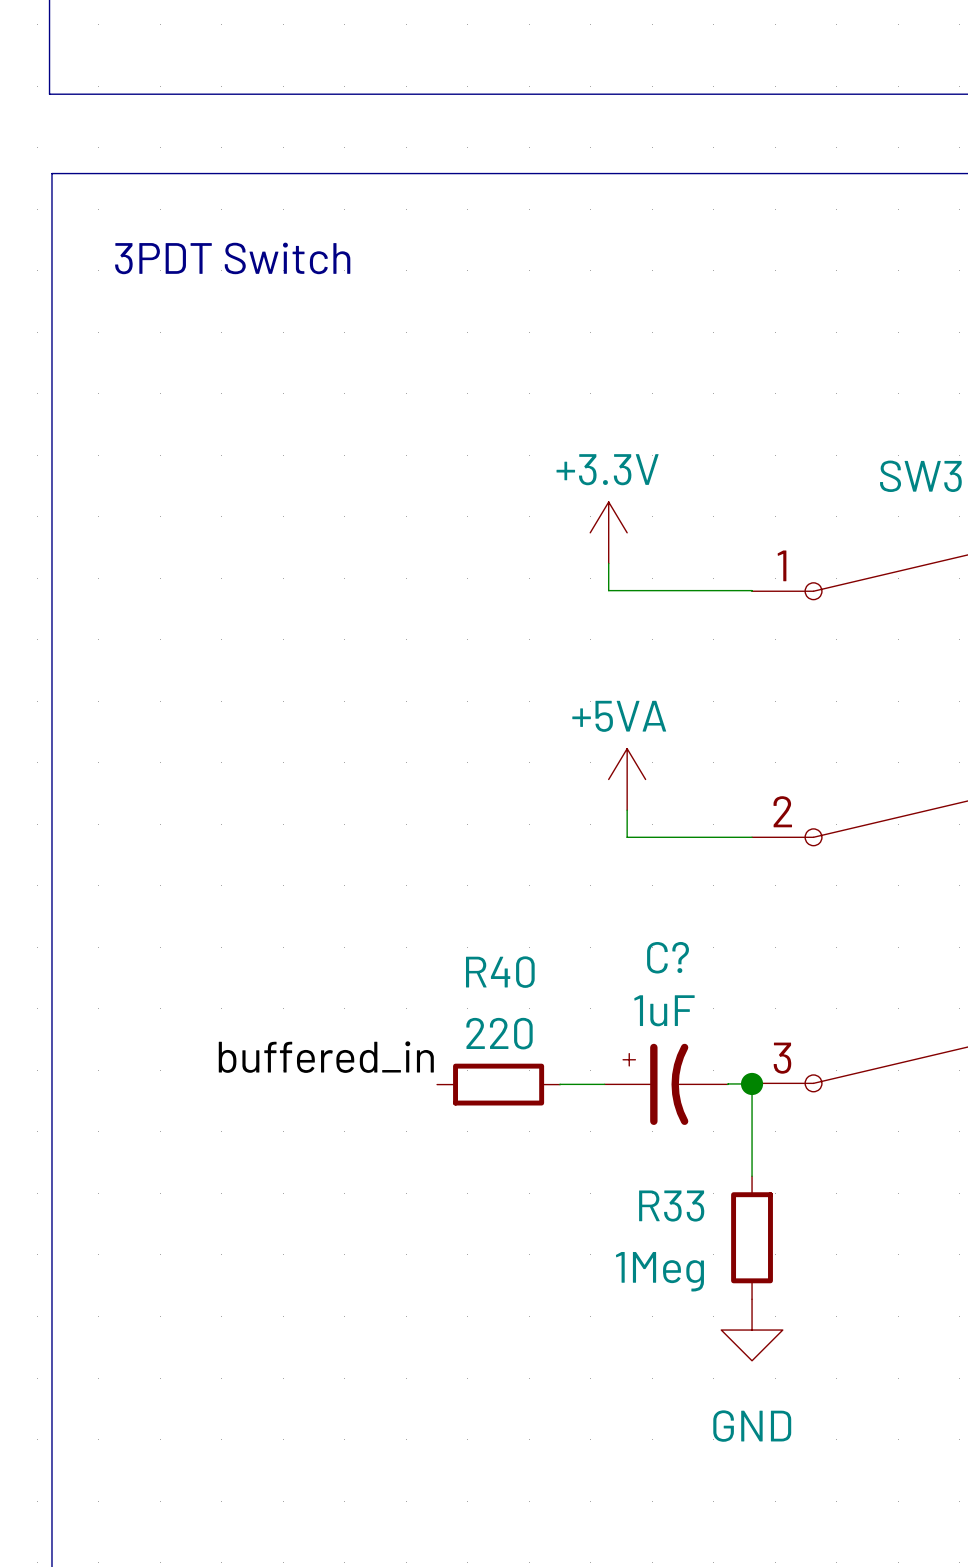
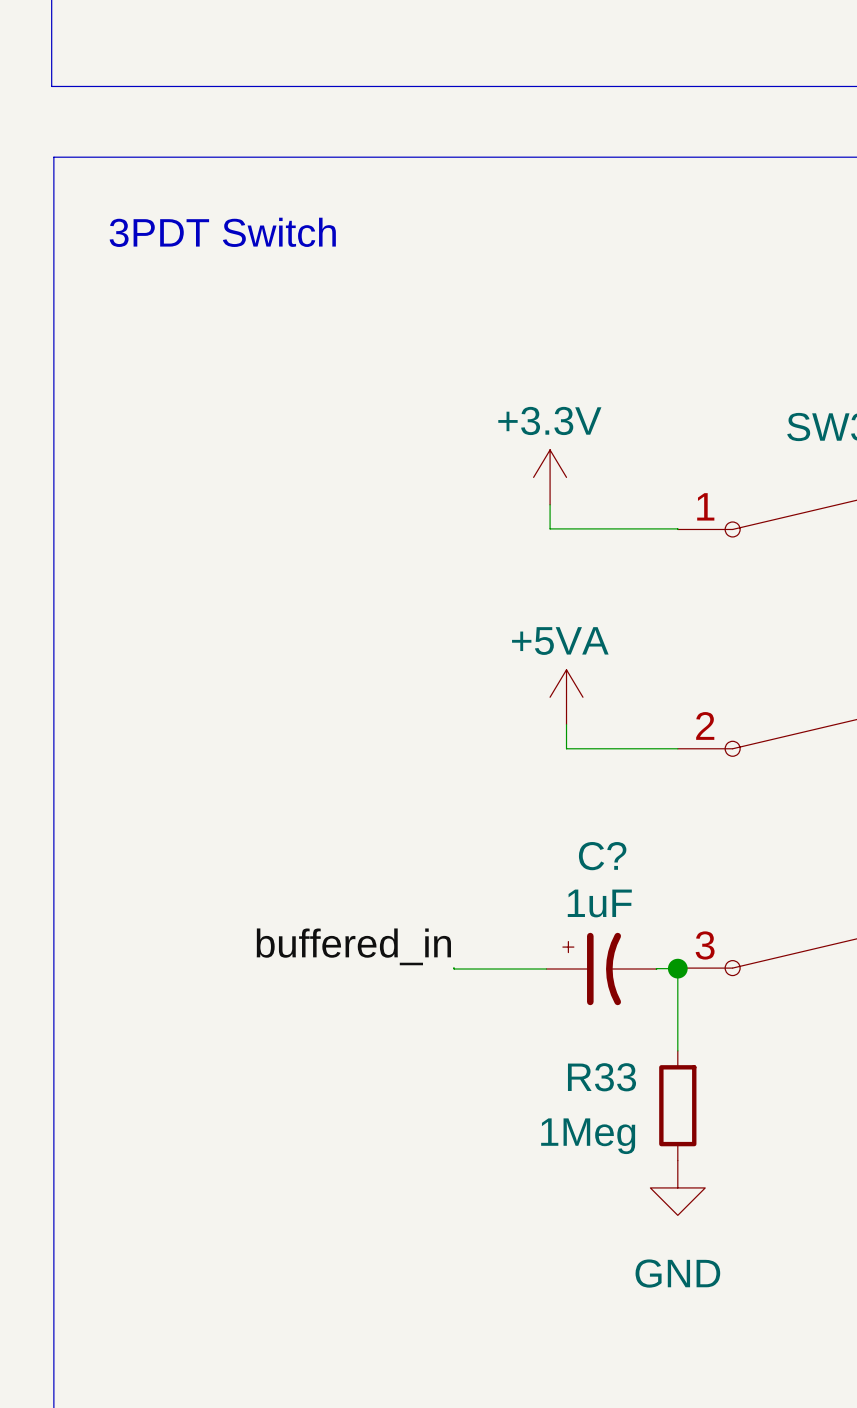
label position: buffered_in (326, 1057) -> buffered_in (353, 946)
wire: none -> (453, 968) (506, 969)
R40: 220 (498, 1084) -> none

